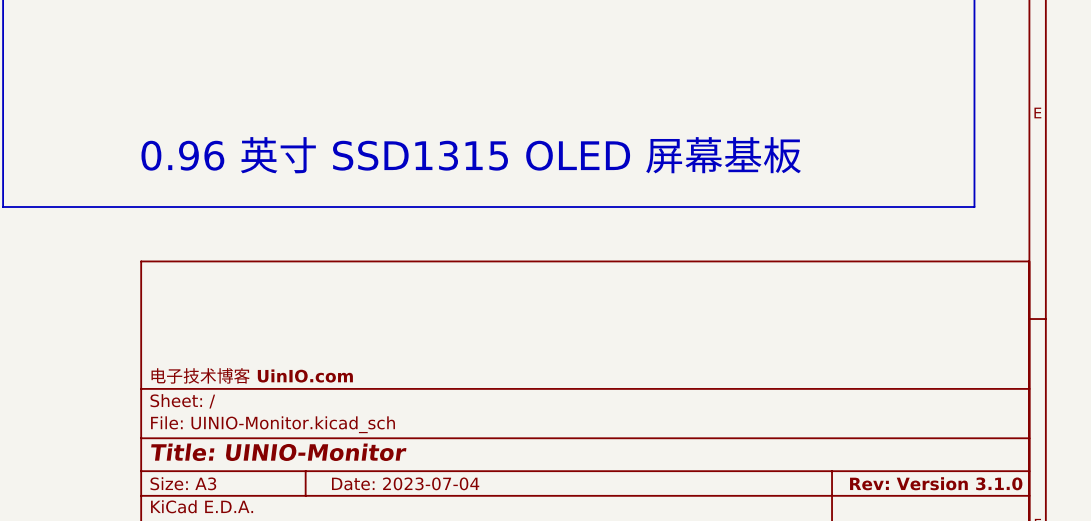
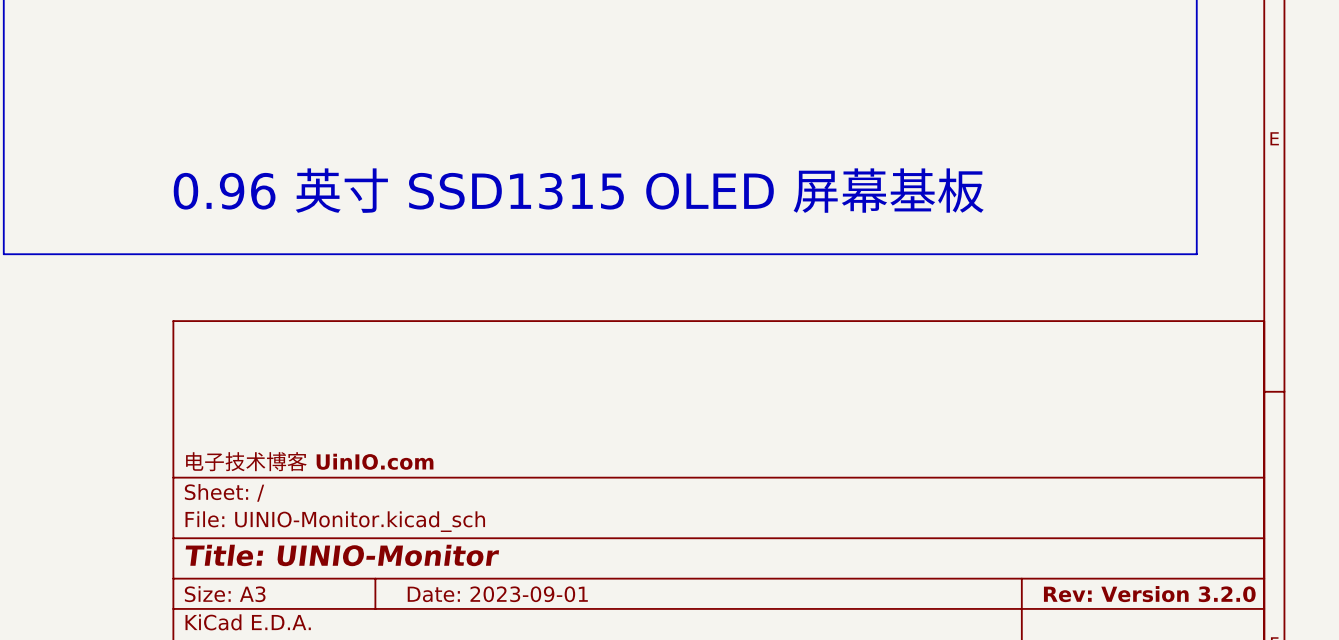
title block: Date: 2023-07-04 (405, 483) -> Date: 2023-09-01 (497, 594)
title block: Rev: Version 3.1.0 (936, 483) -> Rev: Version 3.2.0 (1149, 594)

